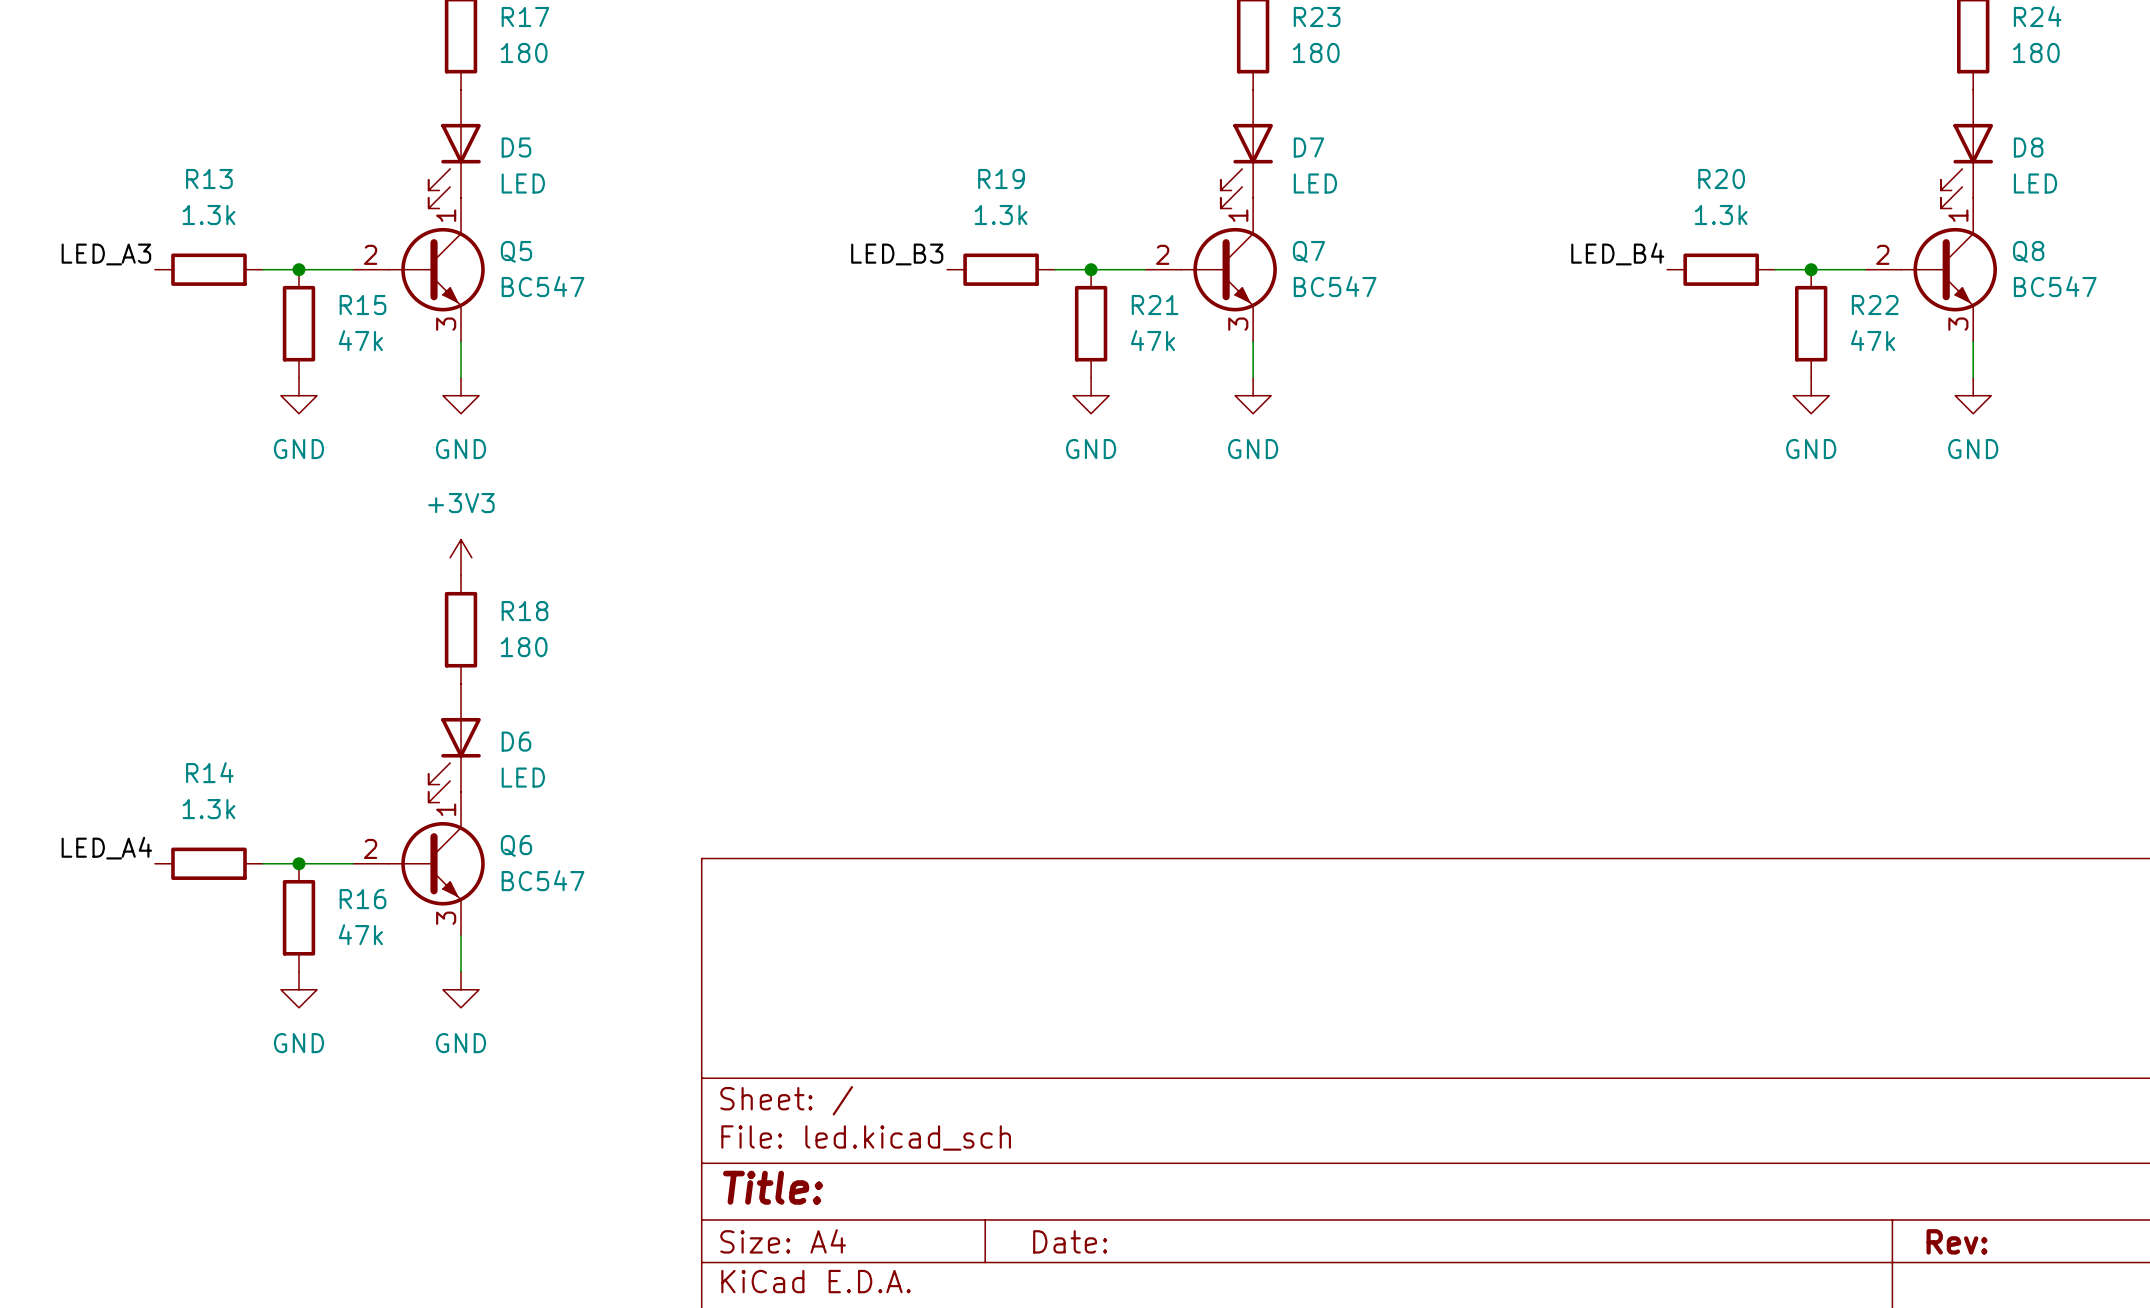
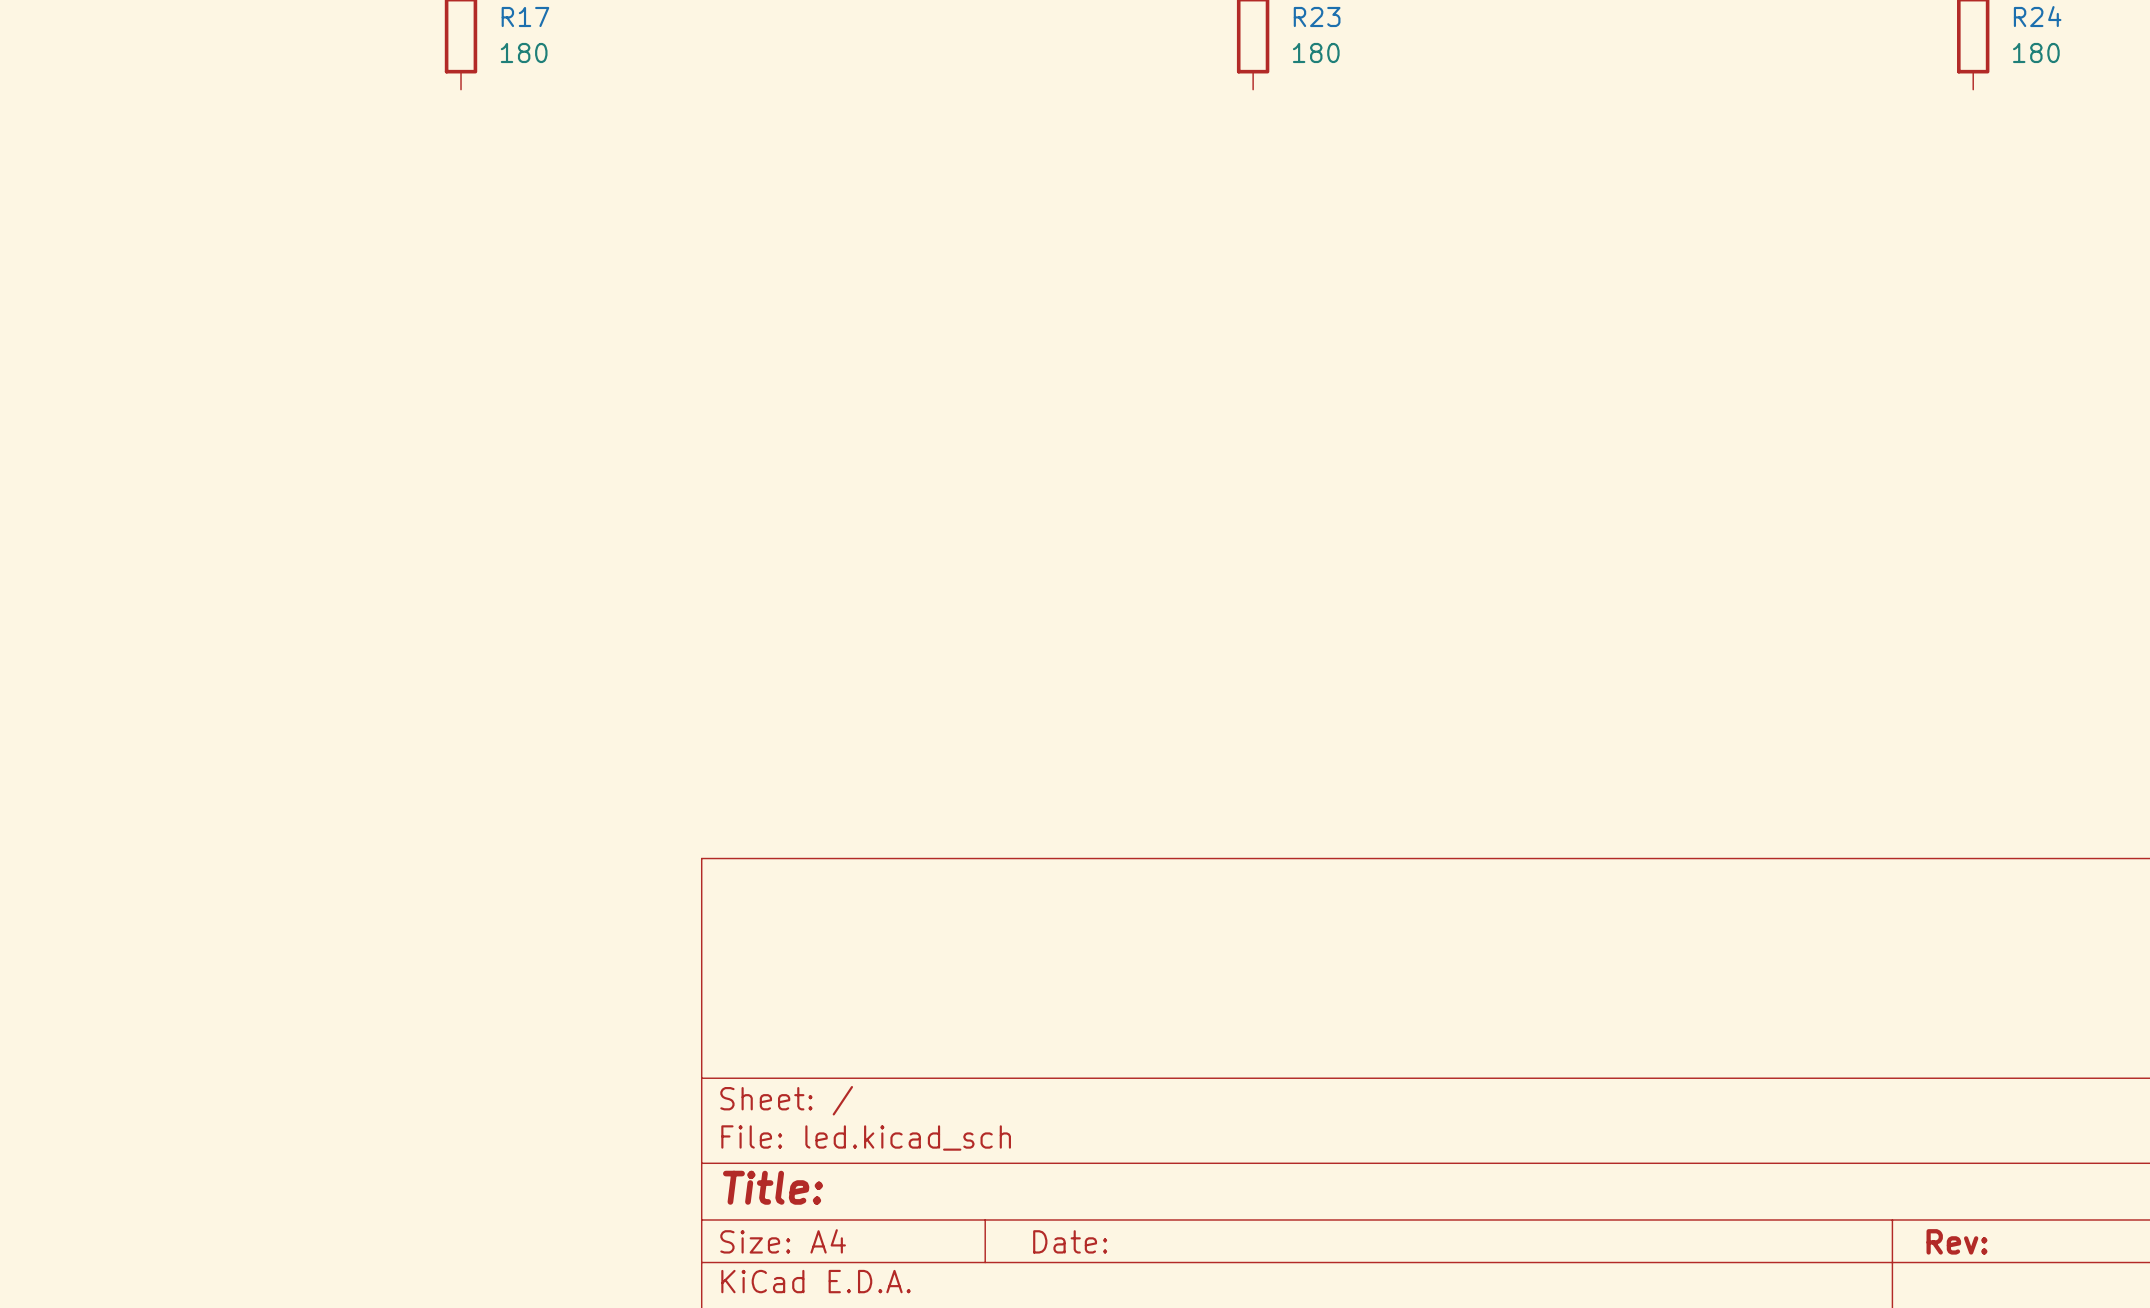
D5: LED (454, 149) -> none
D7: LED (1246, 149) -> none
D8: LED (1966, 149) -> none
label: LED_A3 (106, 254) -> none
label: LED_B3 (897, 254) -> none
label: LED_B4 (1617, 254) -> none
R13: 1.3k (208, 269) -> none
wire: (262, 269) (352, 269) -> none
junction: (298, 269) -> none
Q5: BC547 (418, 269) -> none
R19: 1.3k (1001, 269) -> none
wire: (1055, 269) (1145, 269) -> none
junction: (1091, 269) -> none
Q7: BC547 (1210, 269) -> none
R20: 1.3k (1721, 269) -> none
wire: (1775, 269) (1865, 269) -> none
junction: (1811, 269) -> none
Q8: BC547 (1931, 269) -> none
R15: 47k (298, 323) -> none
R21: 47k (1091, 323) -> none
R22: 47k (1811, 323) -> none
wire: (461, 341) (461, 377) -> none
wire: (1253, 341) (1253, 377) -> none
wire: (1973, 341) (1973, 377) -> none
power symbol: GND (298, 395) -> none
power symbol: GND (461, 395) -> none
power symbol: GND (1091, 395) -> none
power symbol: GND (1253, 395) -> none
power symbol: GND (1811, 395) -> none
power symbol: GND (1973, 395) -> none
power symbol: +3V3 (461, 557) -> none
R18: 180 (461, 629) -> none
D6: LED (454, 743) -> none
label: LED_A4 (106, 848) -> none
R14: 1.3k (208, 863) -> none
wire: (262, 863) (352, 863) -> none
junction: (298, 863) -> none
Q6: BC547 (418, 863) -> none
R16: 47k (298, 917) -> none
wire: (461, 935) (461, 971) -> none
power symbol: GND (298, 989) -> none
power symbol: GND (461, 989) -> none

